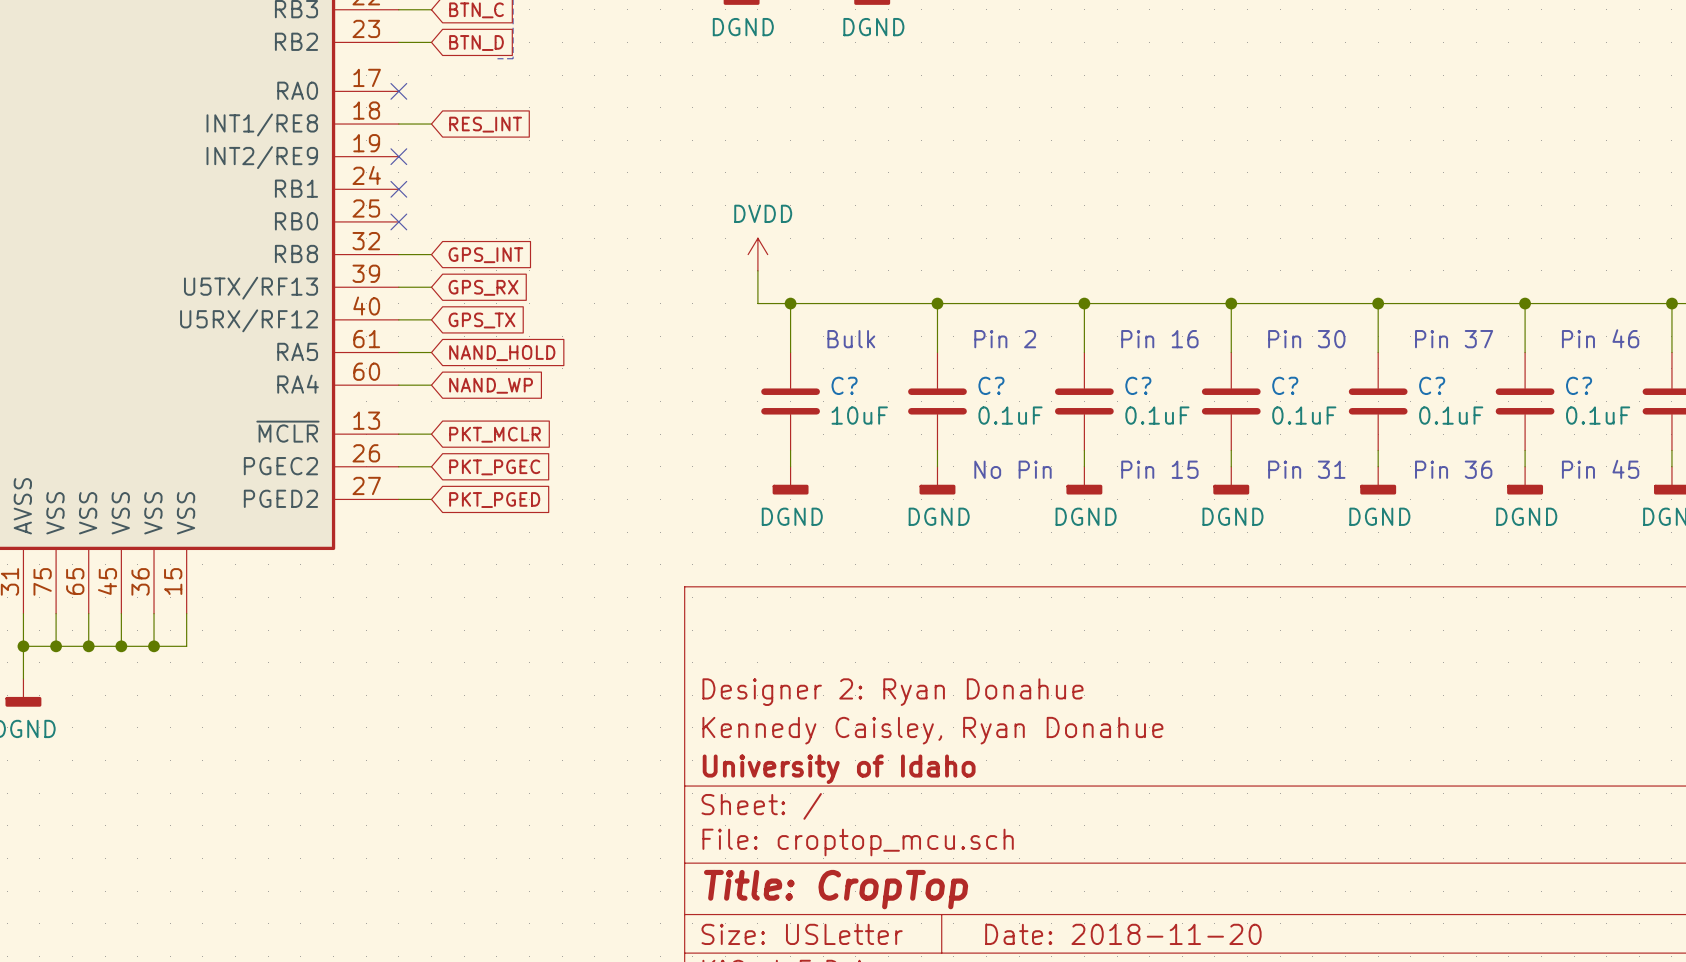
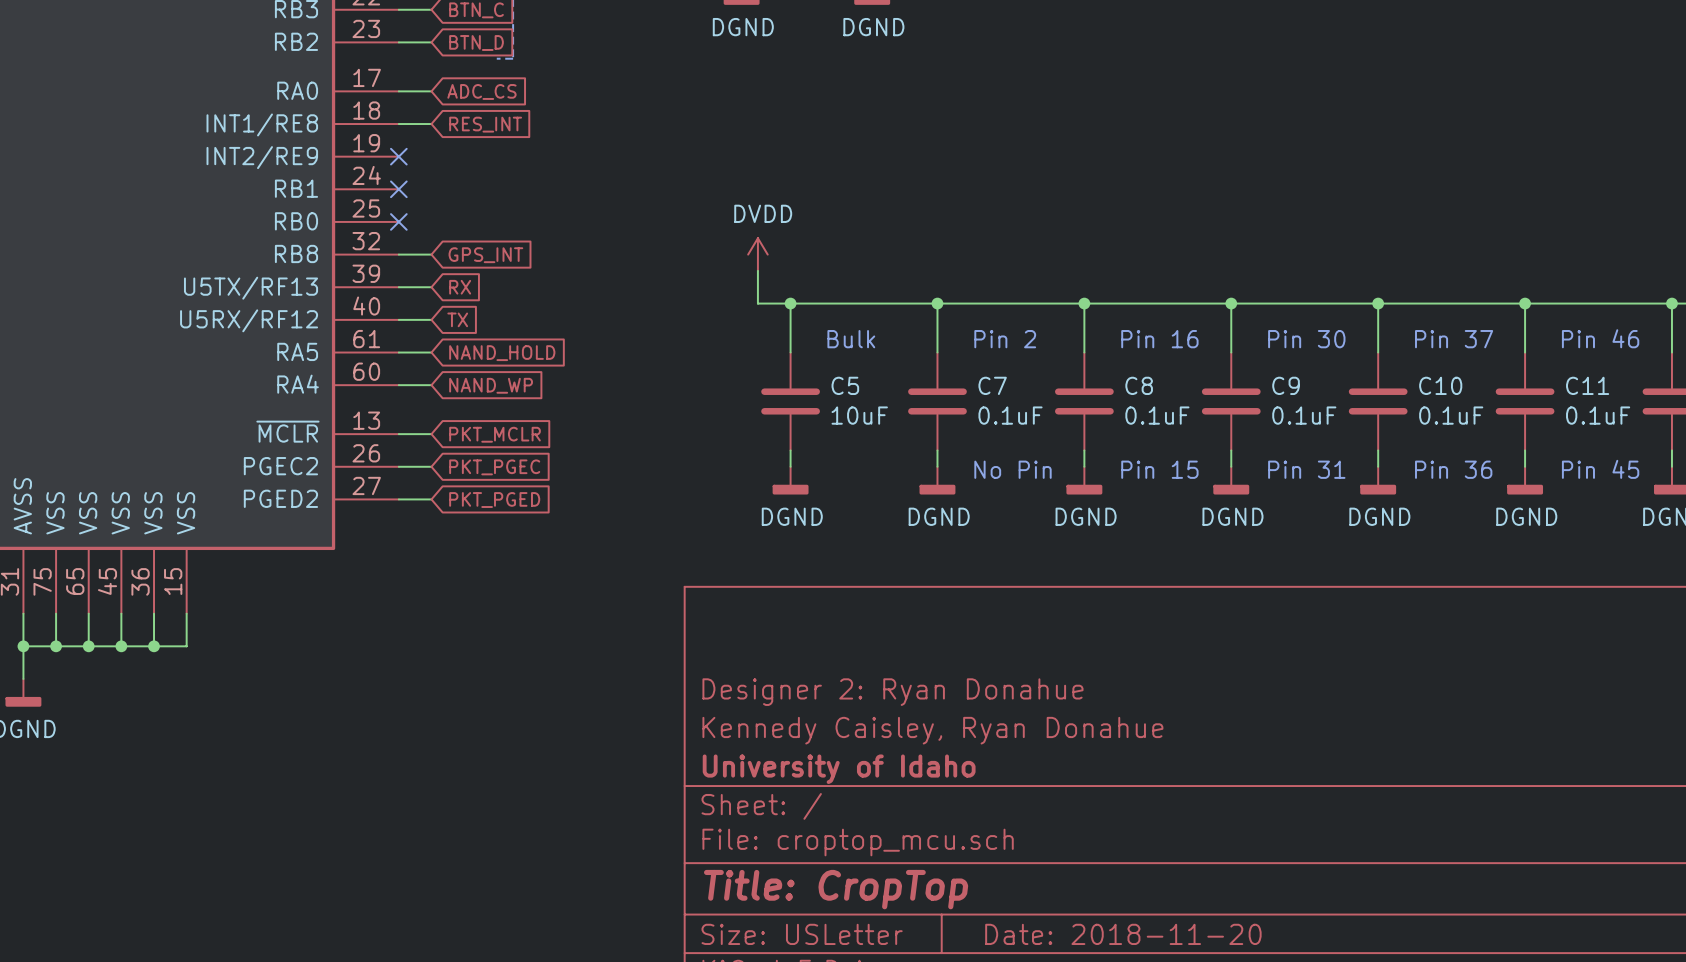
wire: none -> (398, 91) (431, 91)
no-connect mark: (398, 91) -> none
global label: none -> ADC_CS (481, 91)
global label: GPS_RX (483, 287) -> RX (460, 287)
global label: GPS_TX (481, 320) -> TX (457, 319)
C? name: C? (844, 385) -> C5 (845, 385)
C? name: C? (991, 385) -> C7 (992, 385)
C? name: C? (1138, 385) -> C8 (1139, 385)
C? name: C? (1285, 385) -> C9 (1286, 385)
C? name: C? (1432, 385) -> C10 (1440, 385)
C? name: C? (1579, 385) -> C11 (1587, 385)

